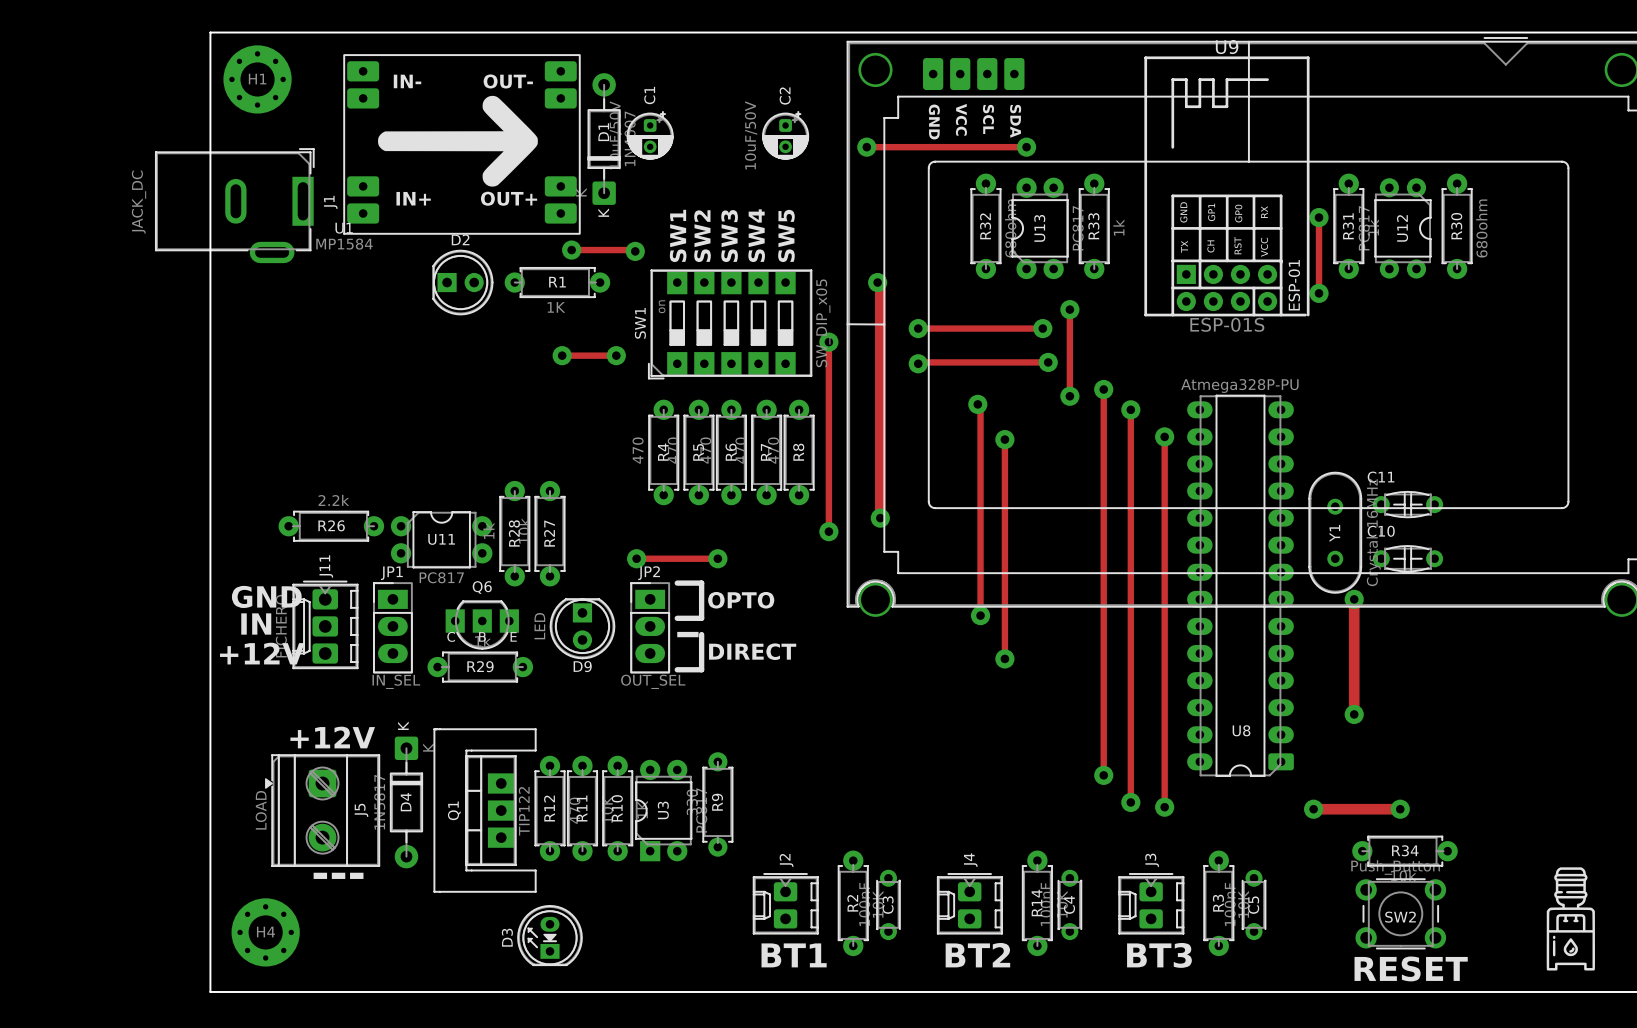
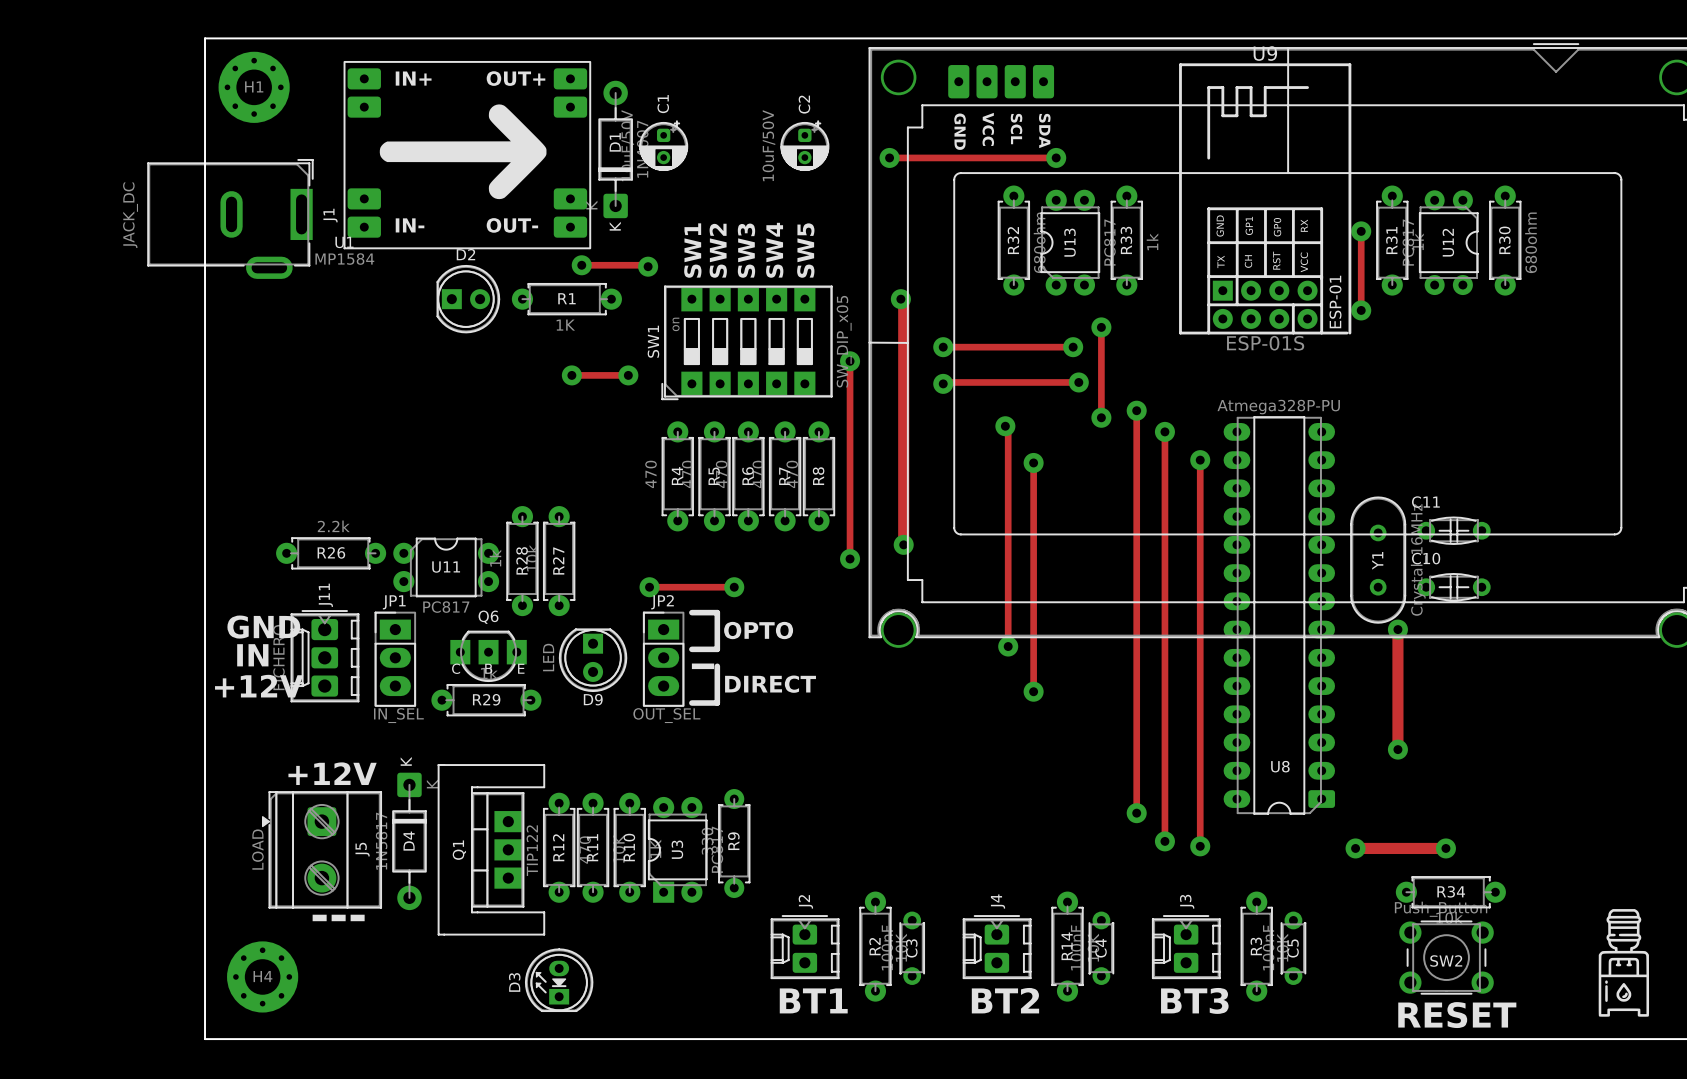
U1 text position: IN- (407, 81) -> IN- (410, 225)
U1 text position: OUT- (508, 81) -> OUT- (512, 225)
U1 text position: IN+ (413, 198) -> IN+ (413, 78)
U1 text position: OUT+ (509, 198) -> OUT+ (516, 78)

